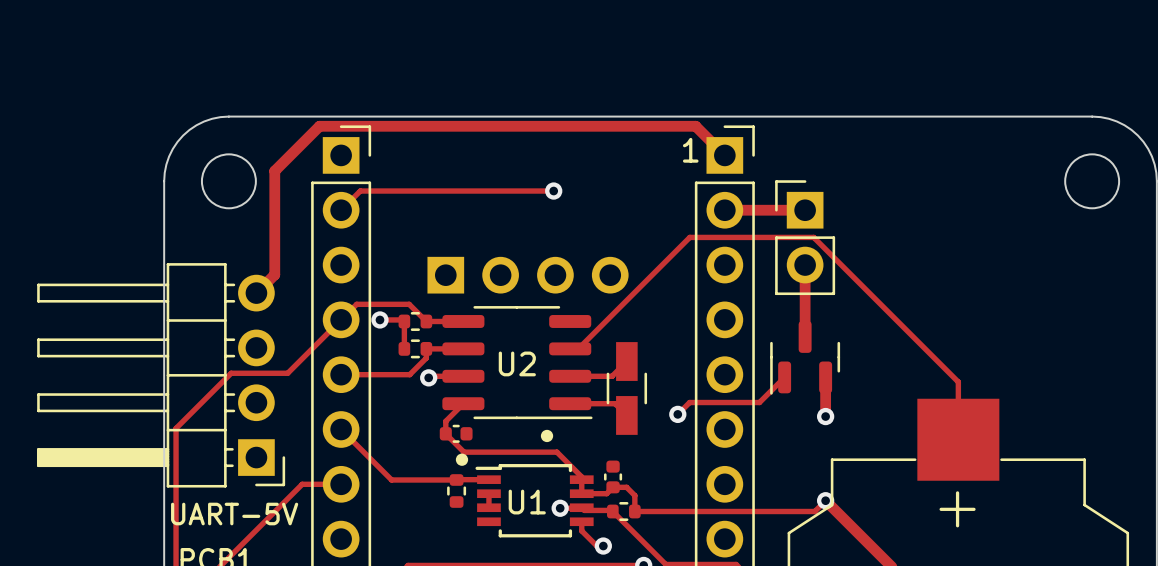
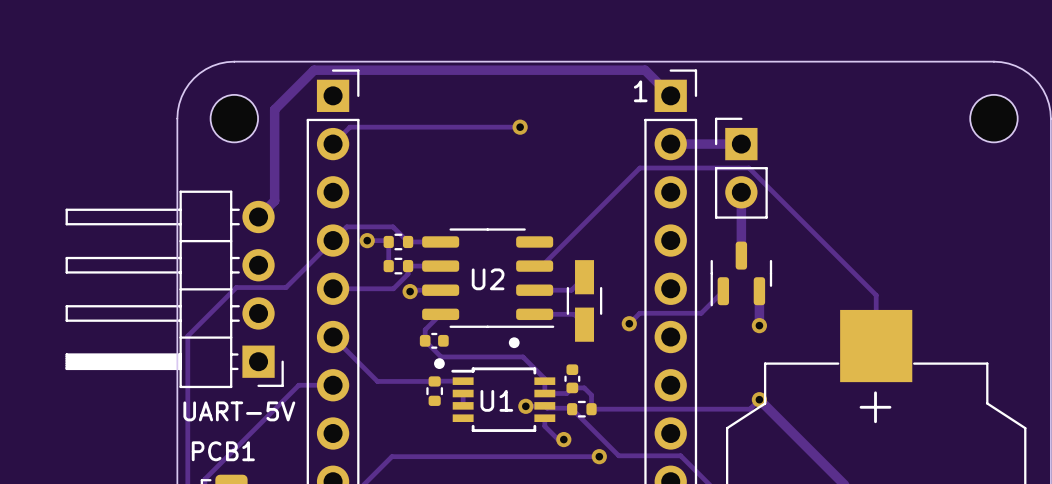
part: (528, 275) -> none

